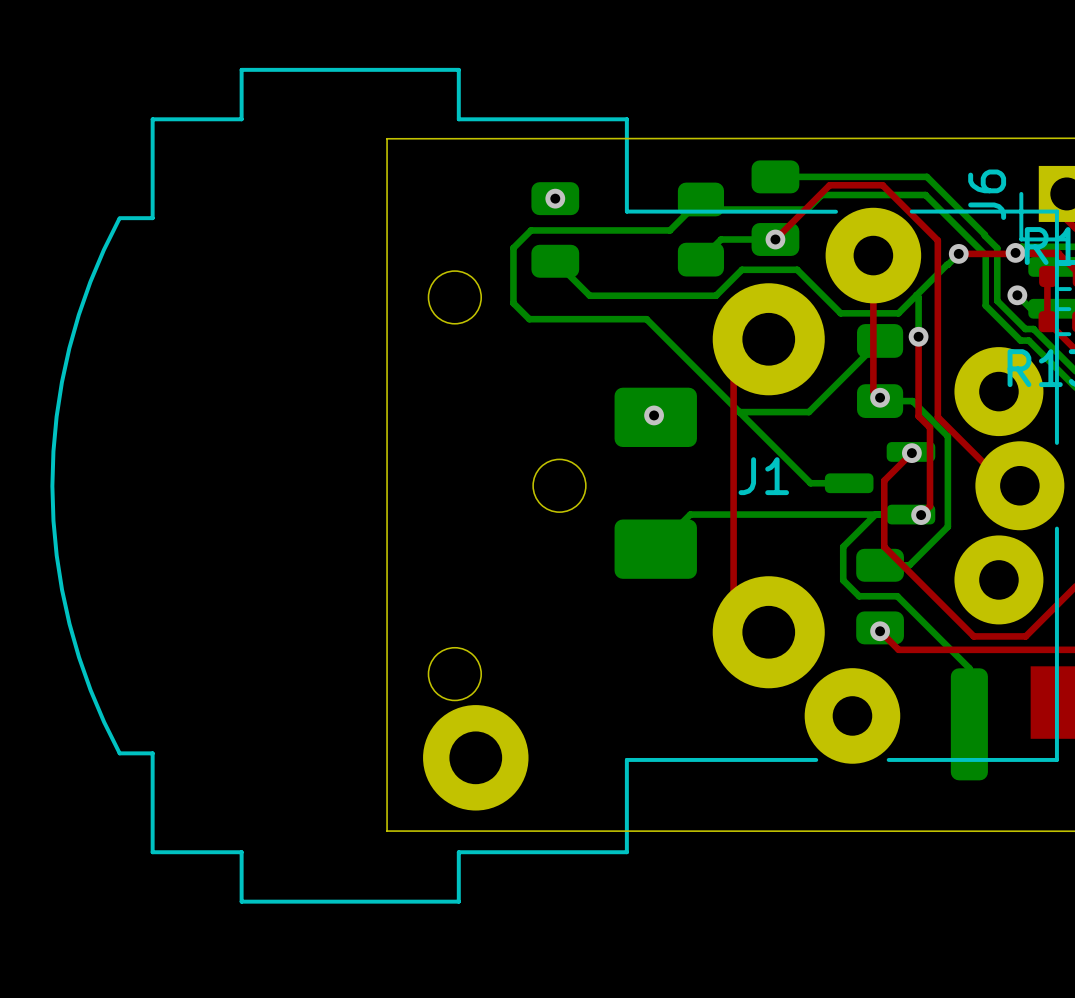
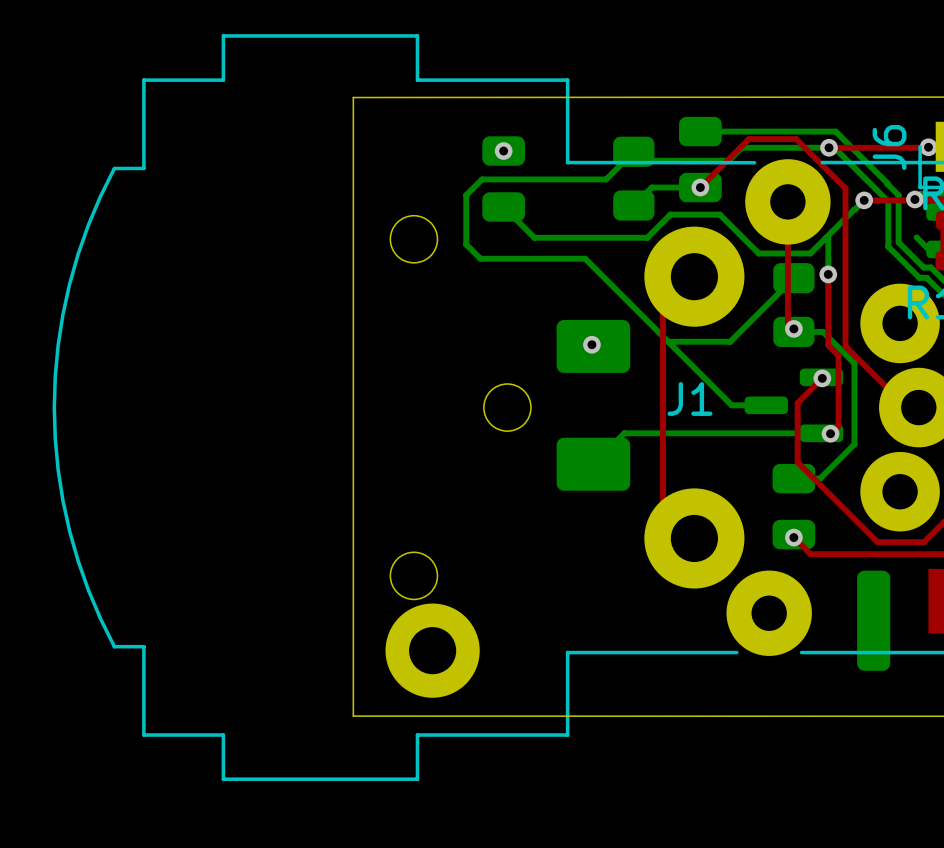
top track: none -> (928, 147) (829, 147)
via: none -> (928, 147)
via: none -> (829, 147)
via: (1017, 295) -> none
bottom track: (875, 514) (843, 546) (843, 580) (859, 596) (897, 596) (969, 668) (969, 724) -> none

